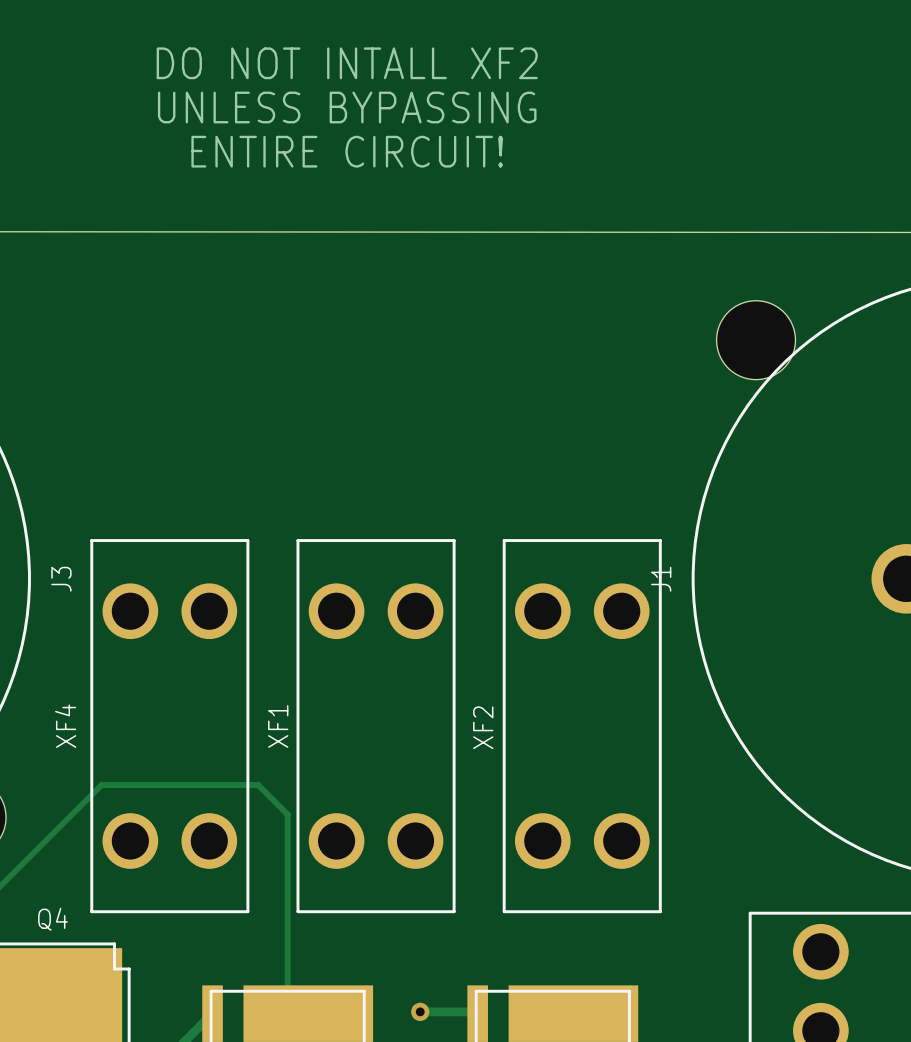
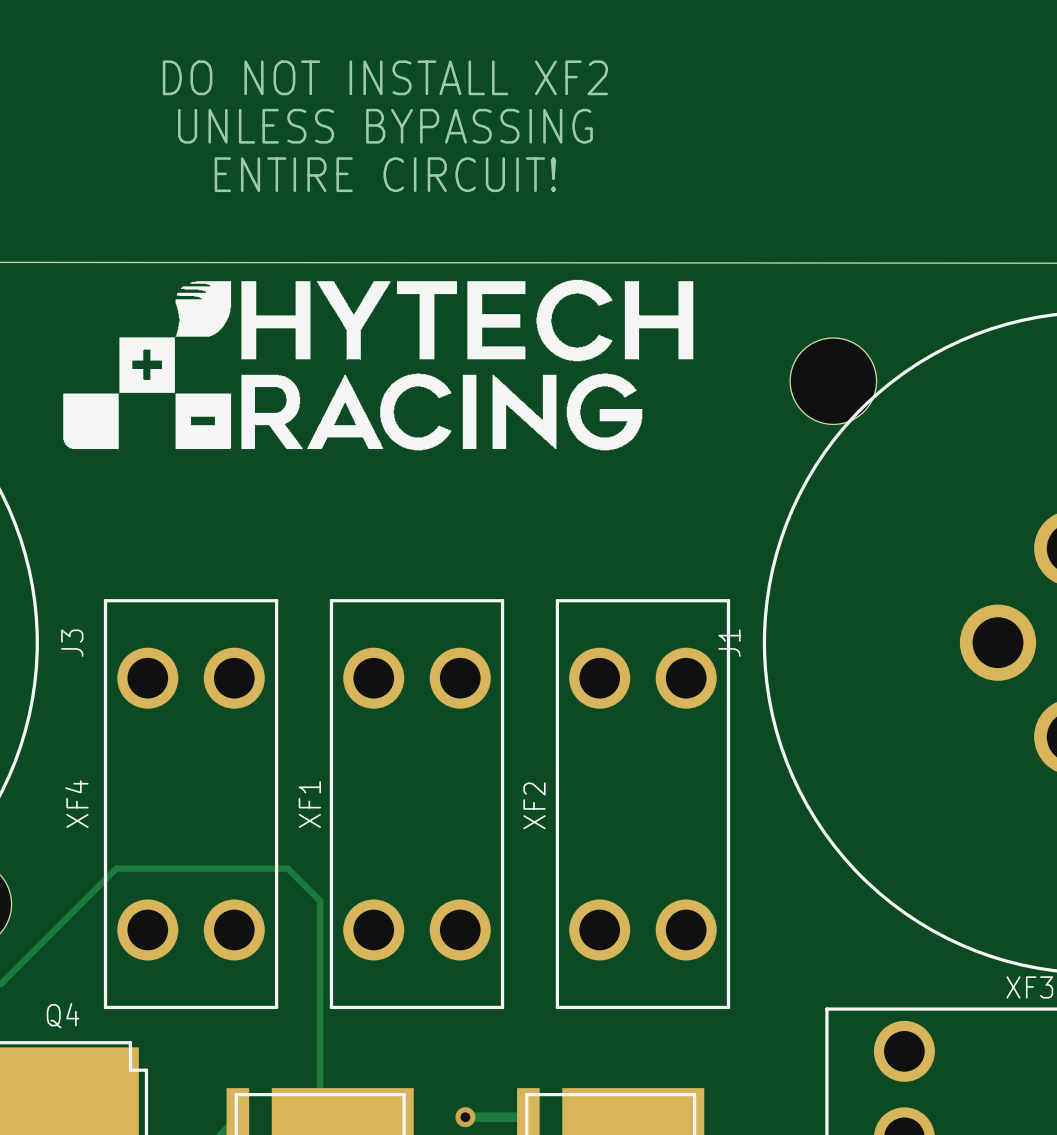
text: DO NOT INTALL XF2 (347, 63) -> DO NOT INSTALL XF2 (385, 77)
drawing: none -> [63, 279, 694, 451]

